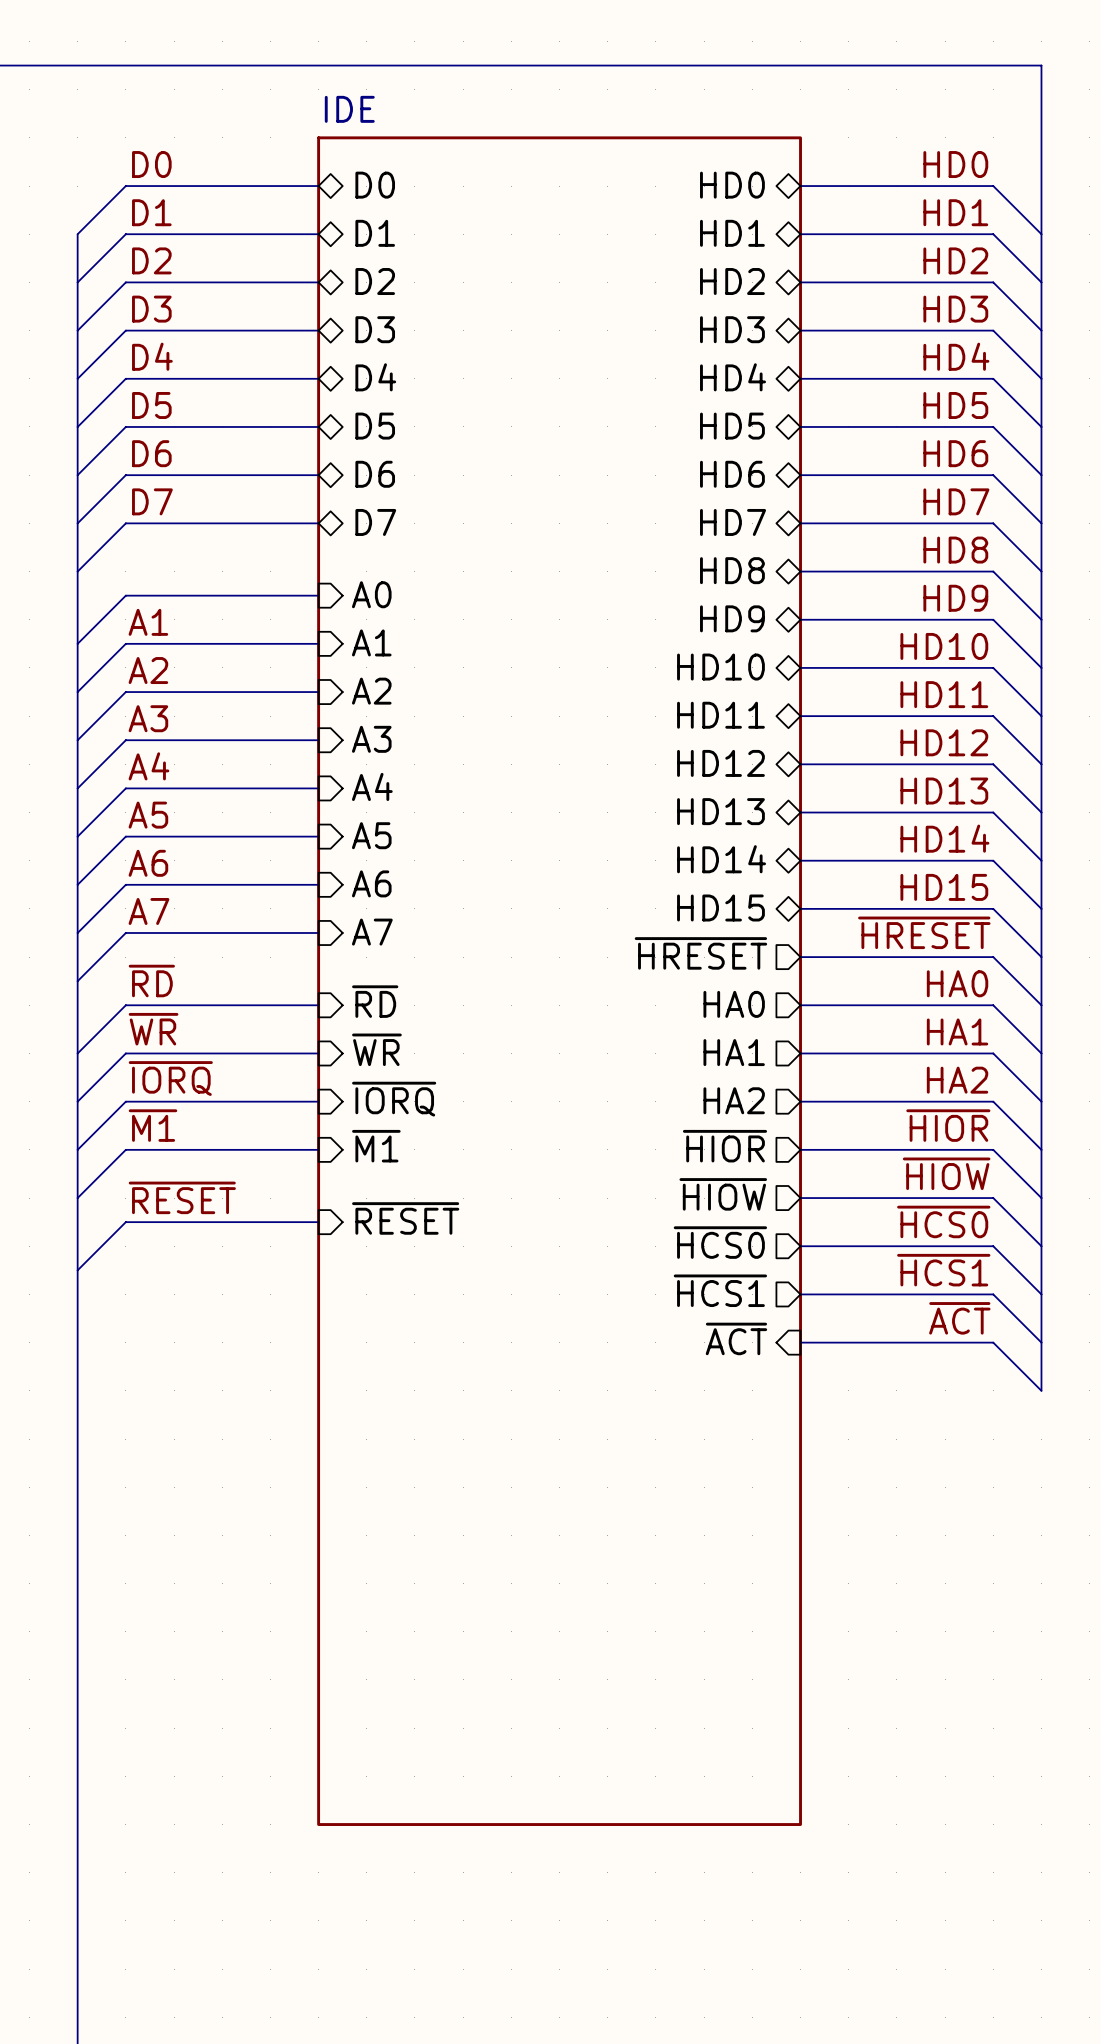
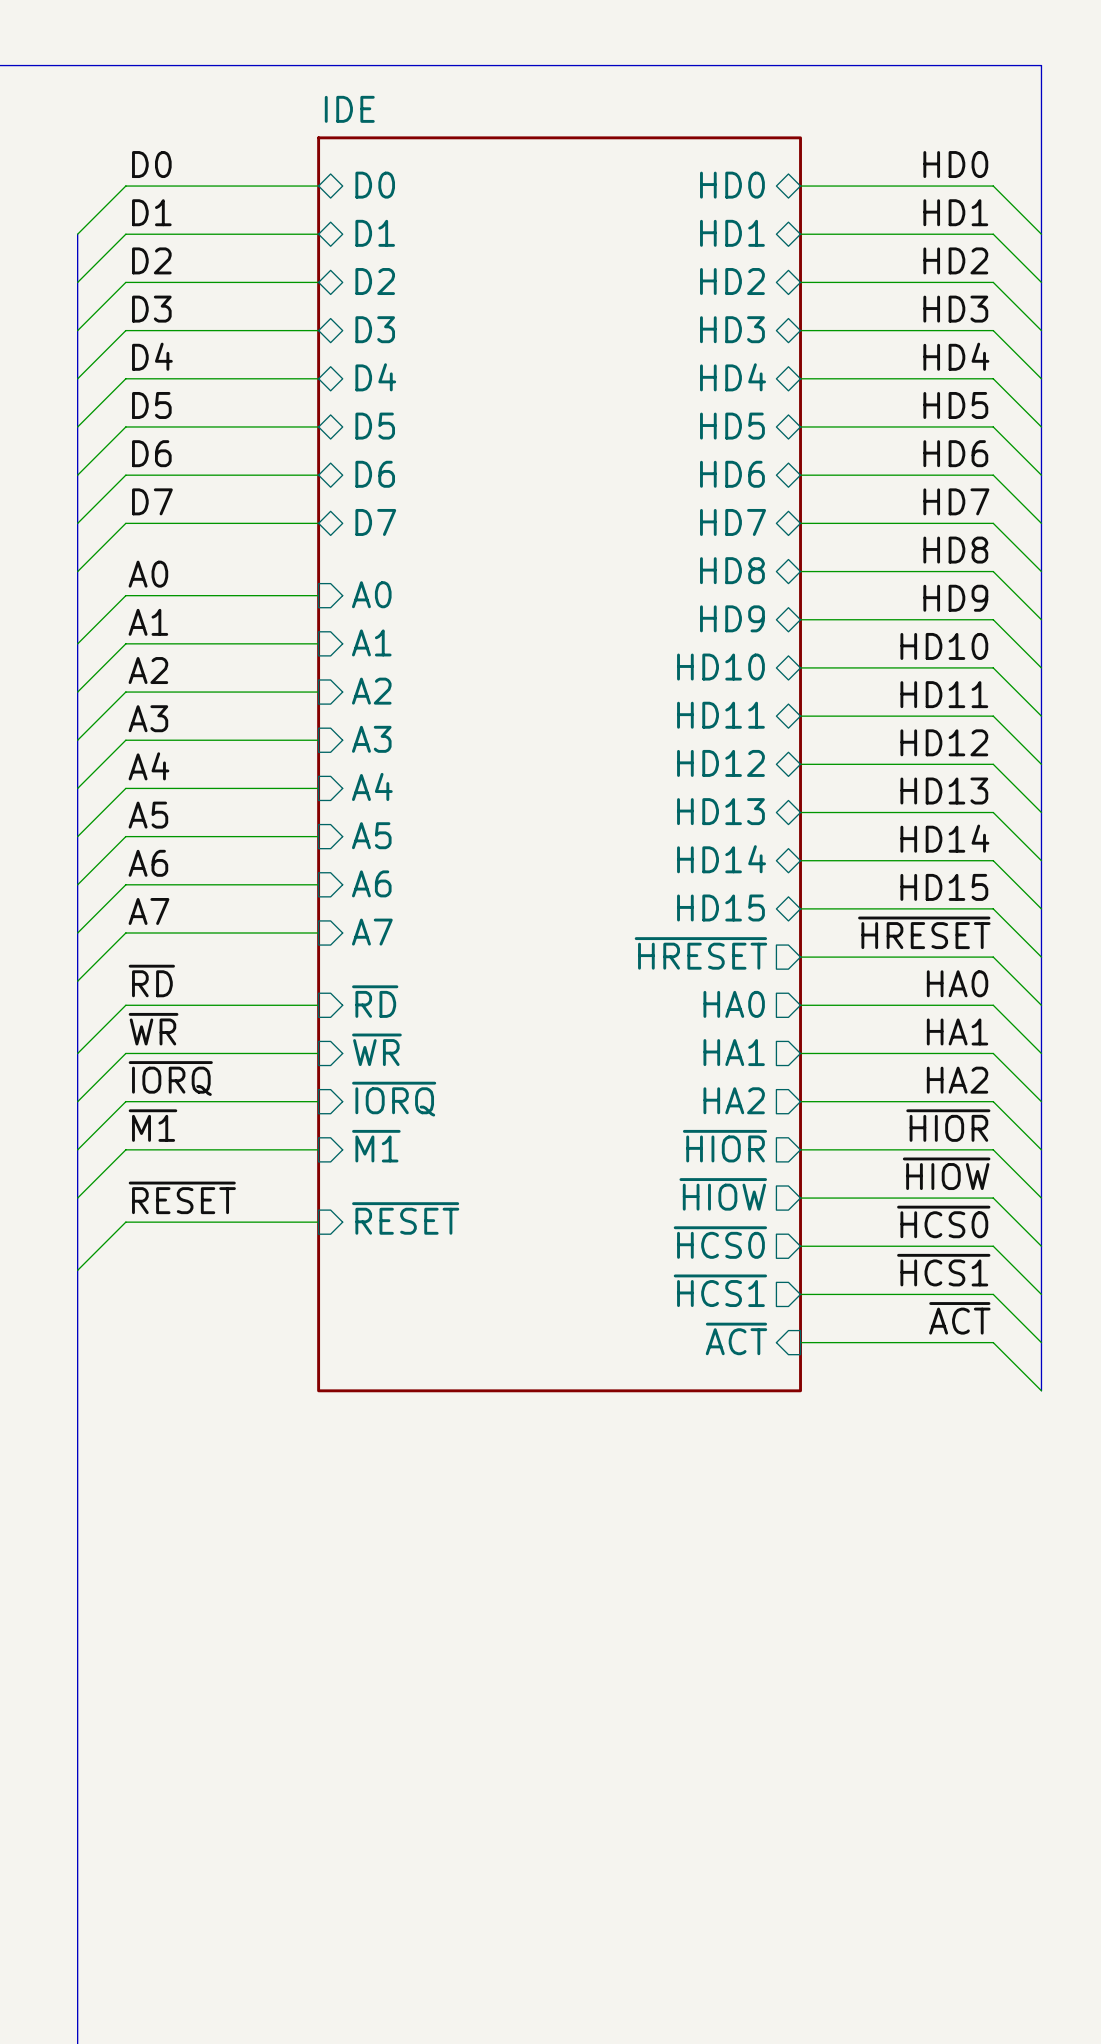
label: none -> A0 (148, 574)
sheet IDE: none -> (559, 764)
sheet IDE: (559, 981) -> none

